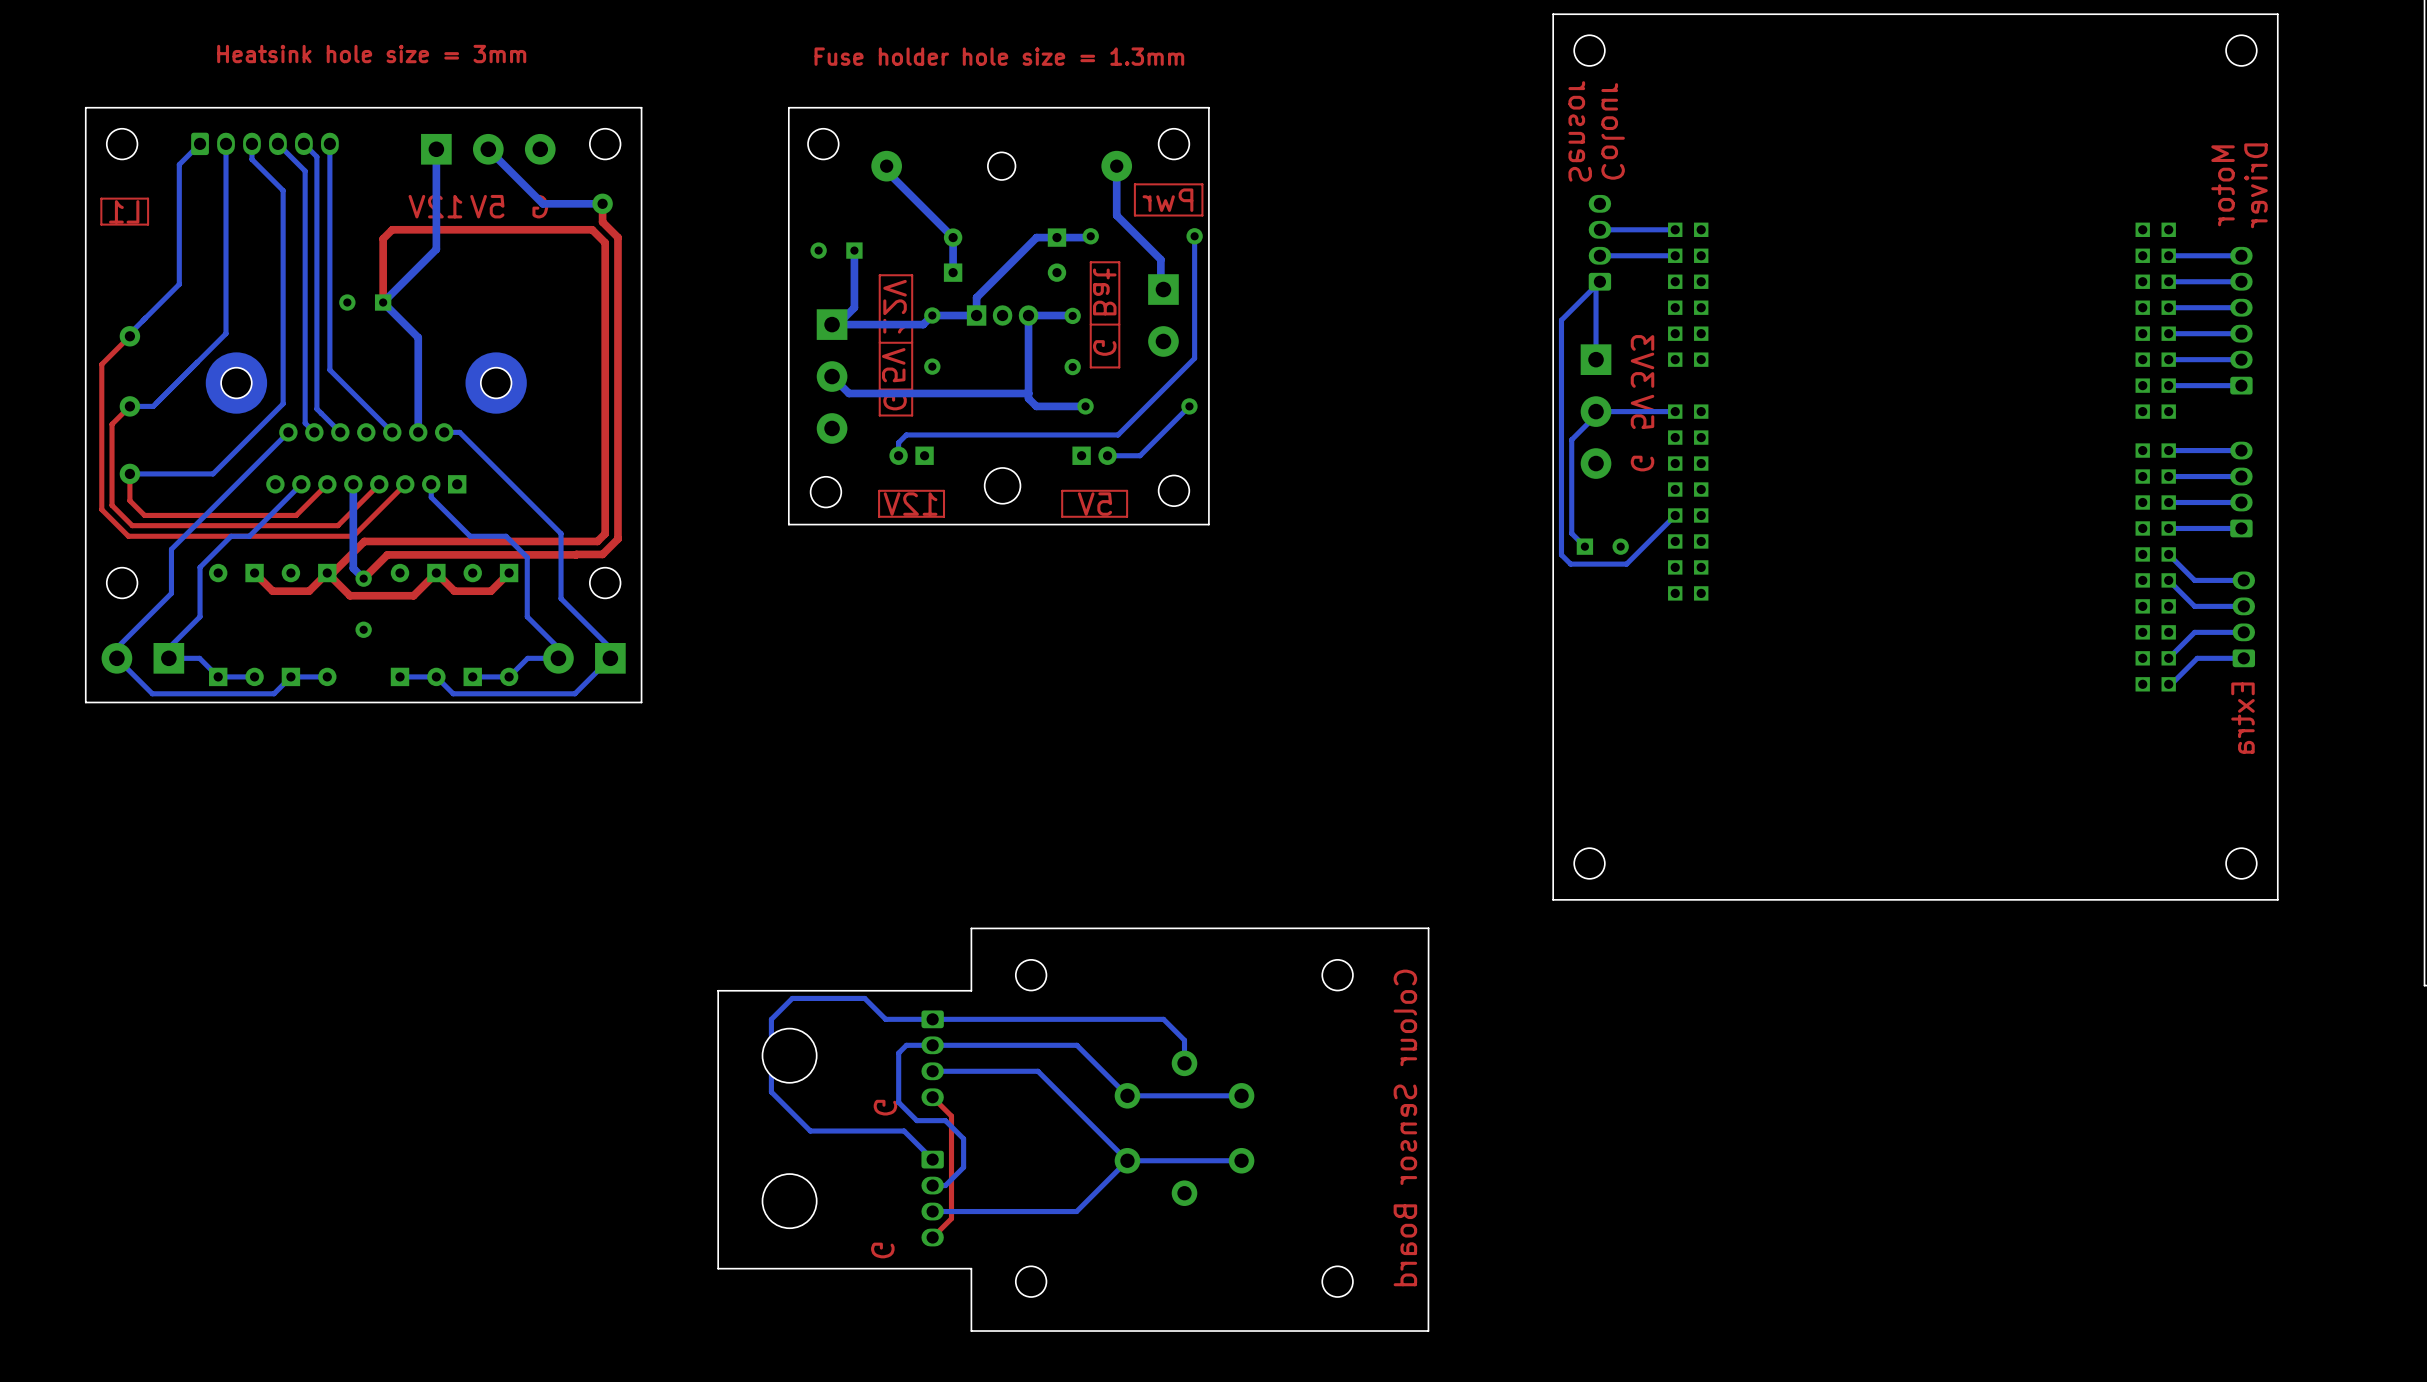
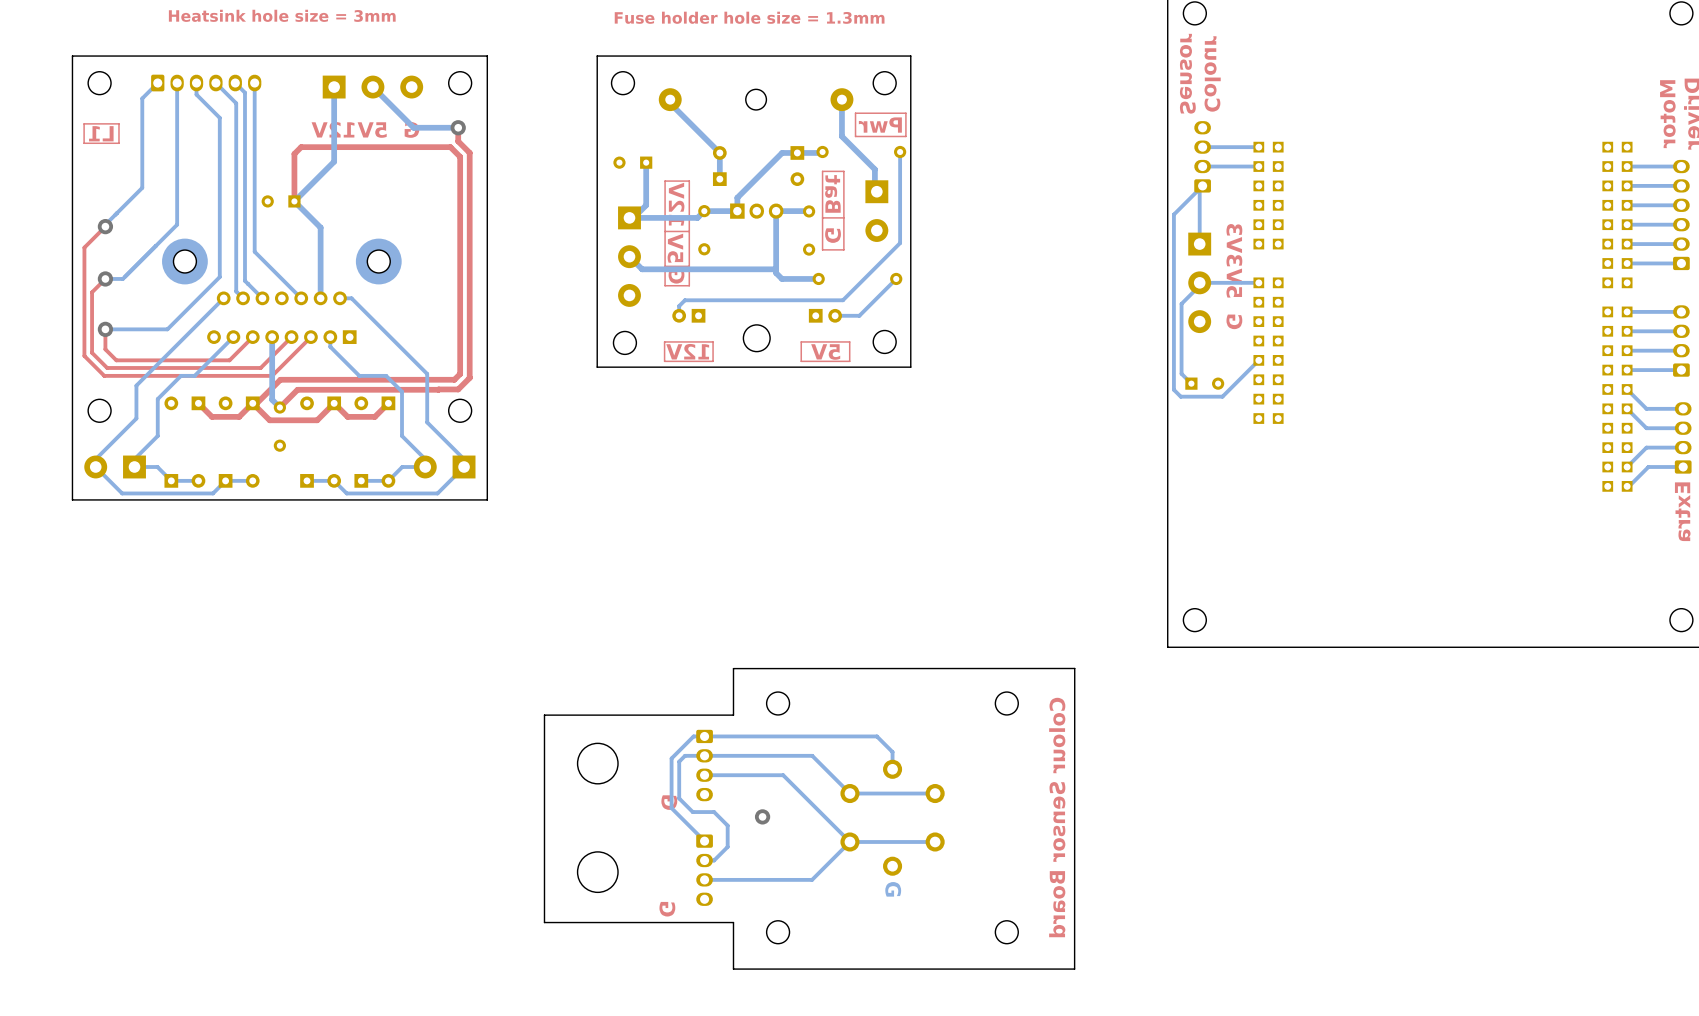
bottom track: (917, 1019) (885, 1019) (864, 998) (792, 998) (771, 1019) (771, 1092) (810, 1131) (904, 1131) -> (693, 736) (671, 758) (671, 808) (683, 819)
top track: (932, 1097) (951, 1116) (951, 1218) (932, 1237) -> none
via: none -> (762, 816)
text: none -> G (893, 889)

